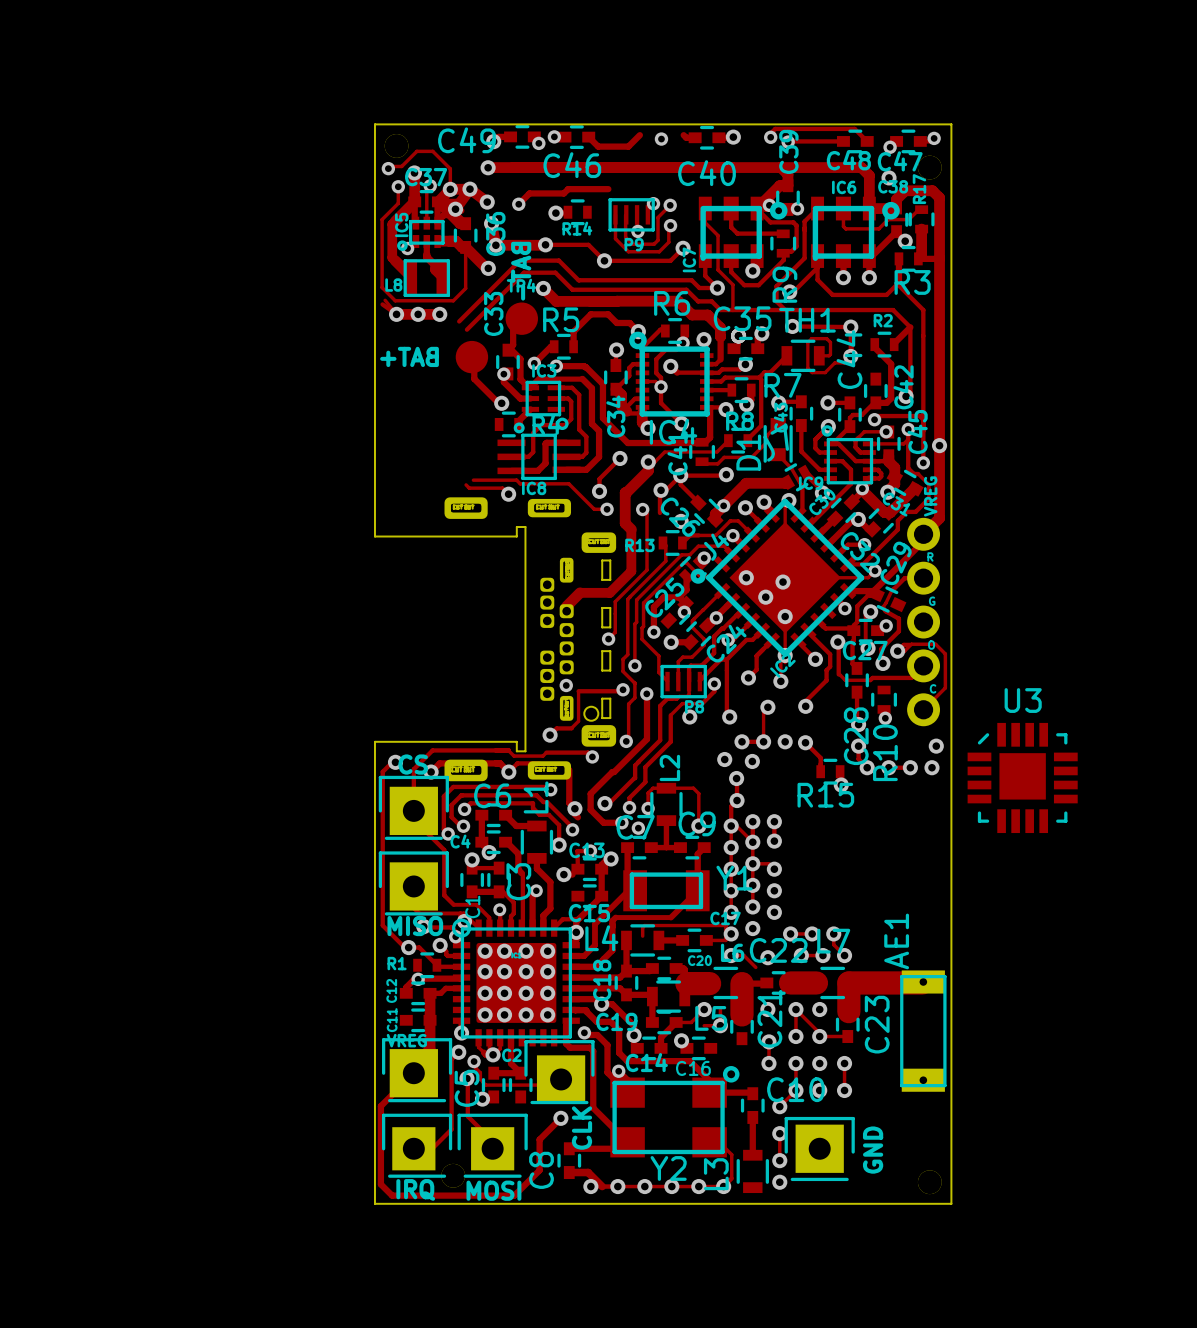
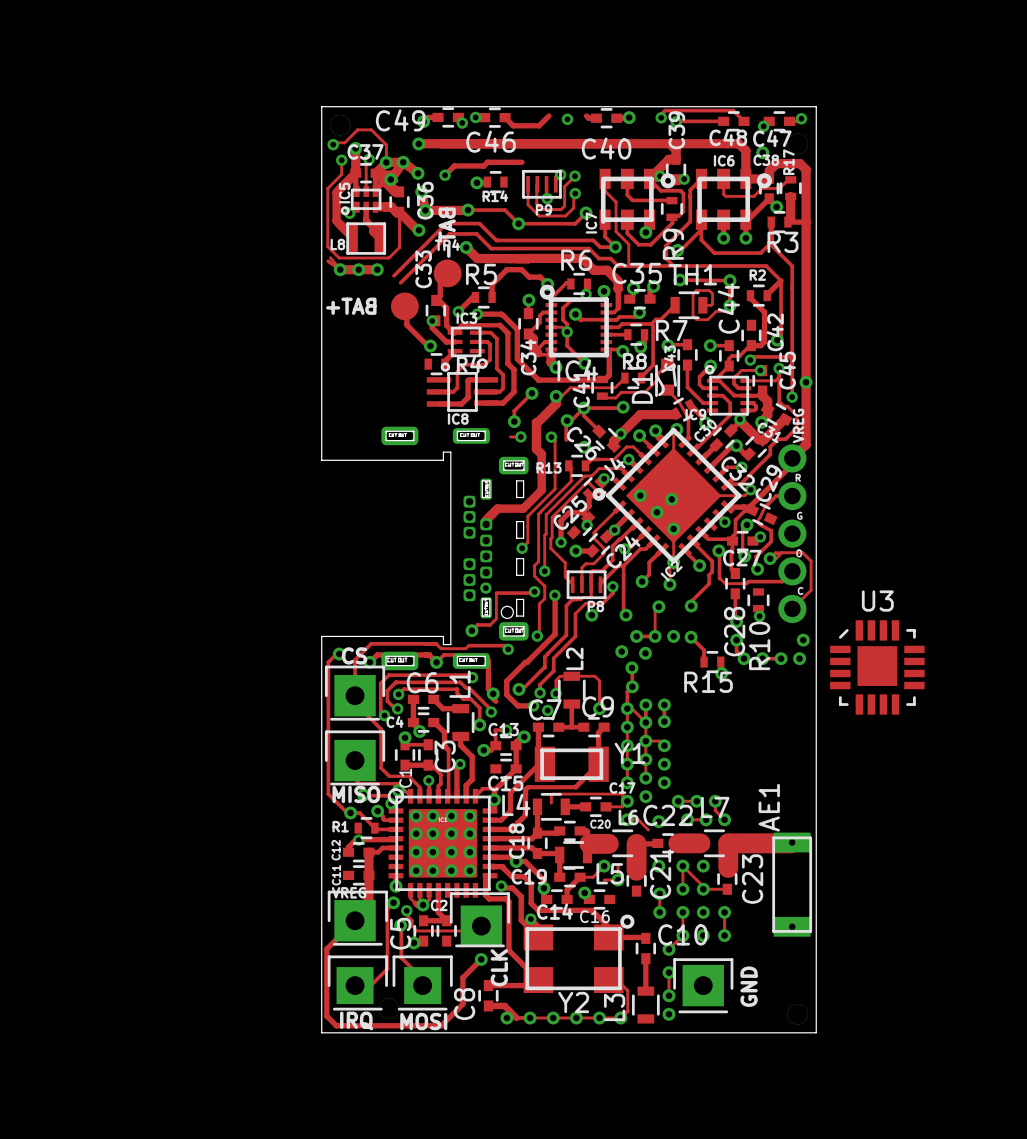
track: (473, 480) (516, 480) (520, 483) (568, 483) (594, 509) -> none
track: (466, 484) (469, 488) (502, 488) (508, 494) -> none
via: (508, 494) -> none

